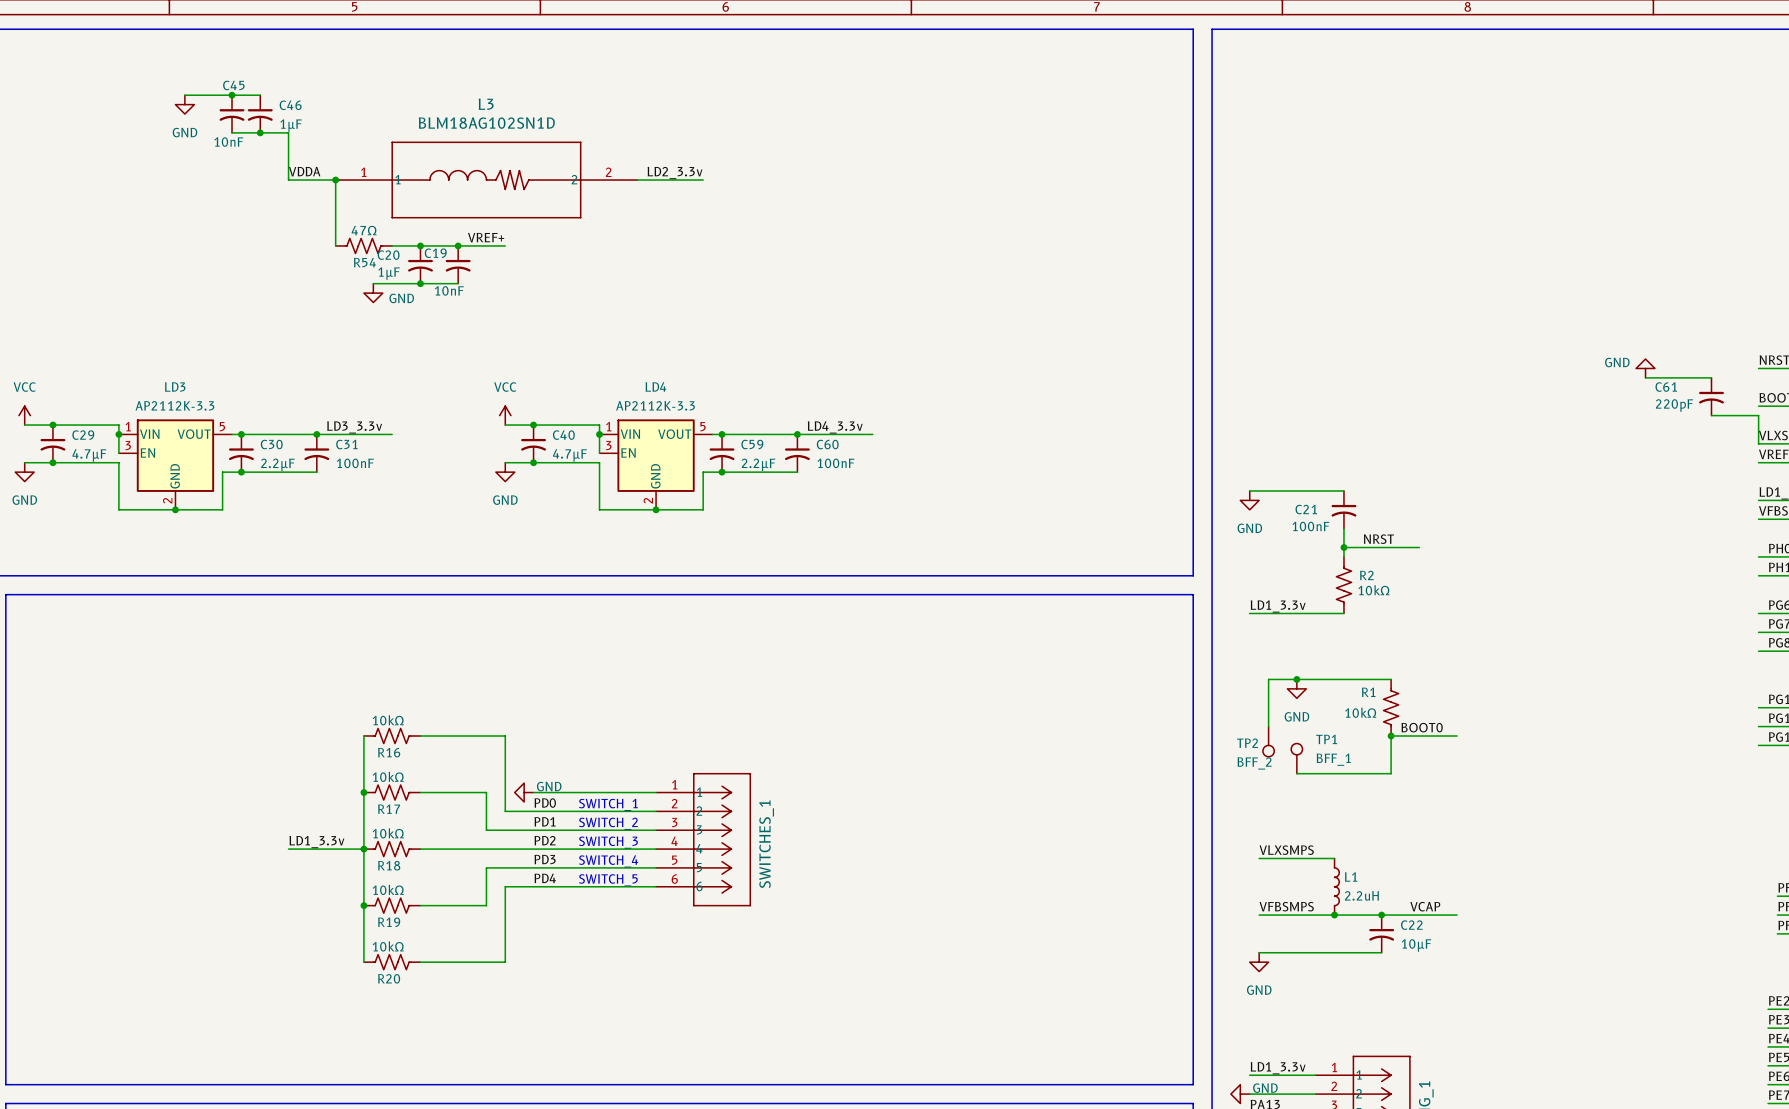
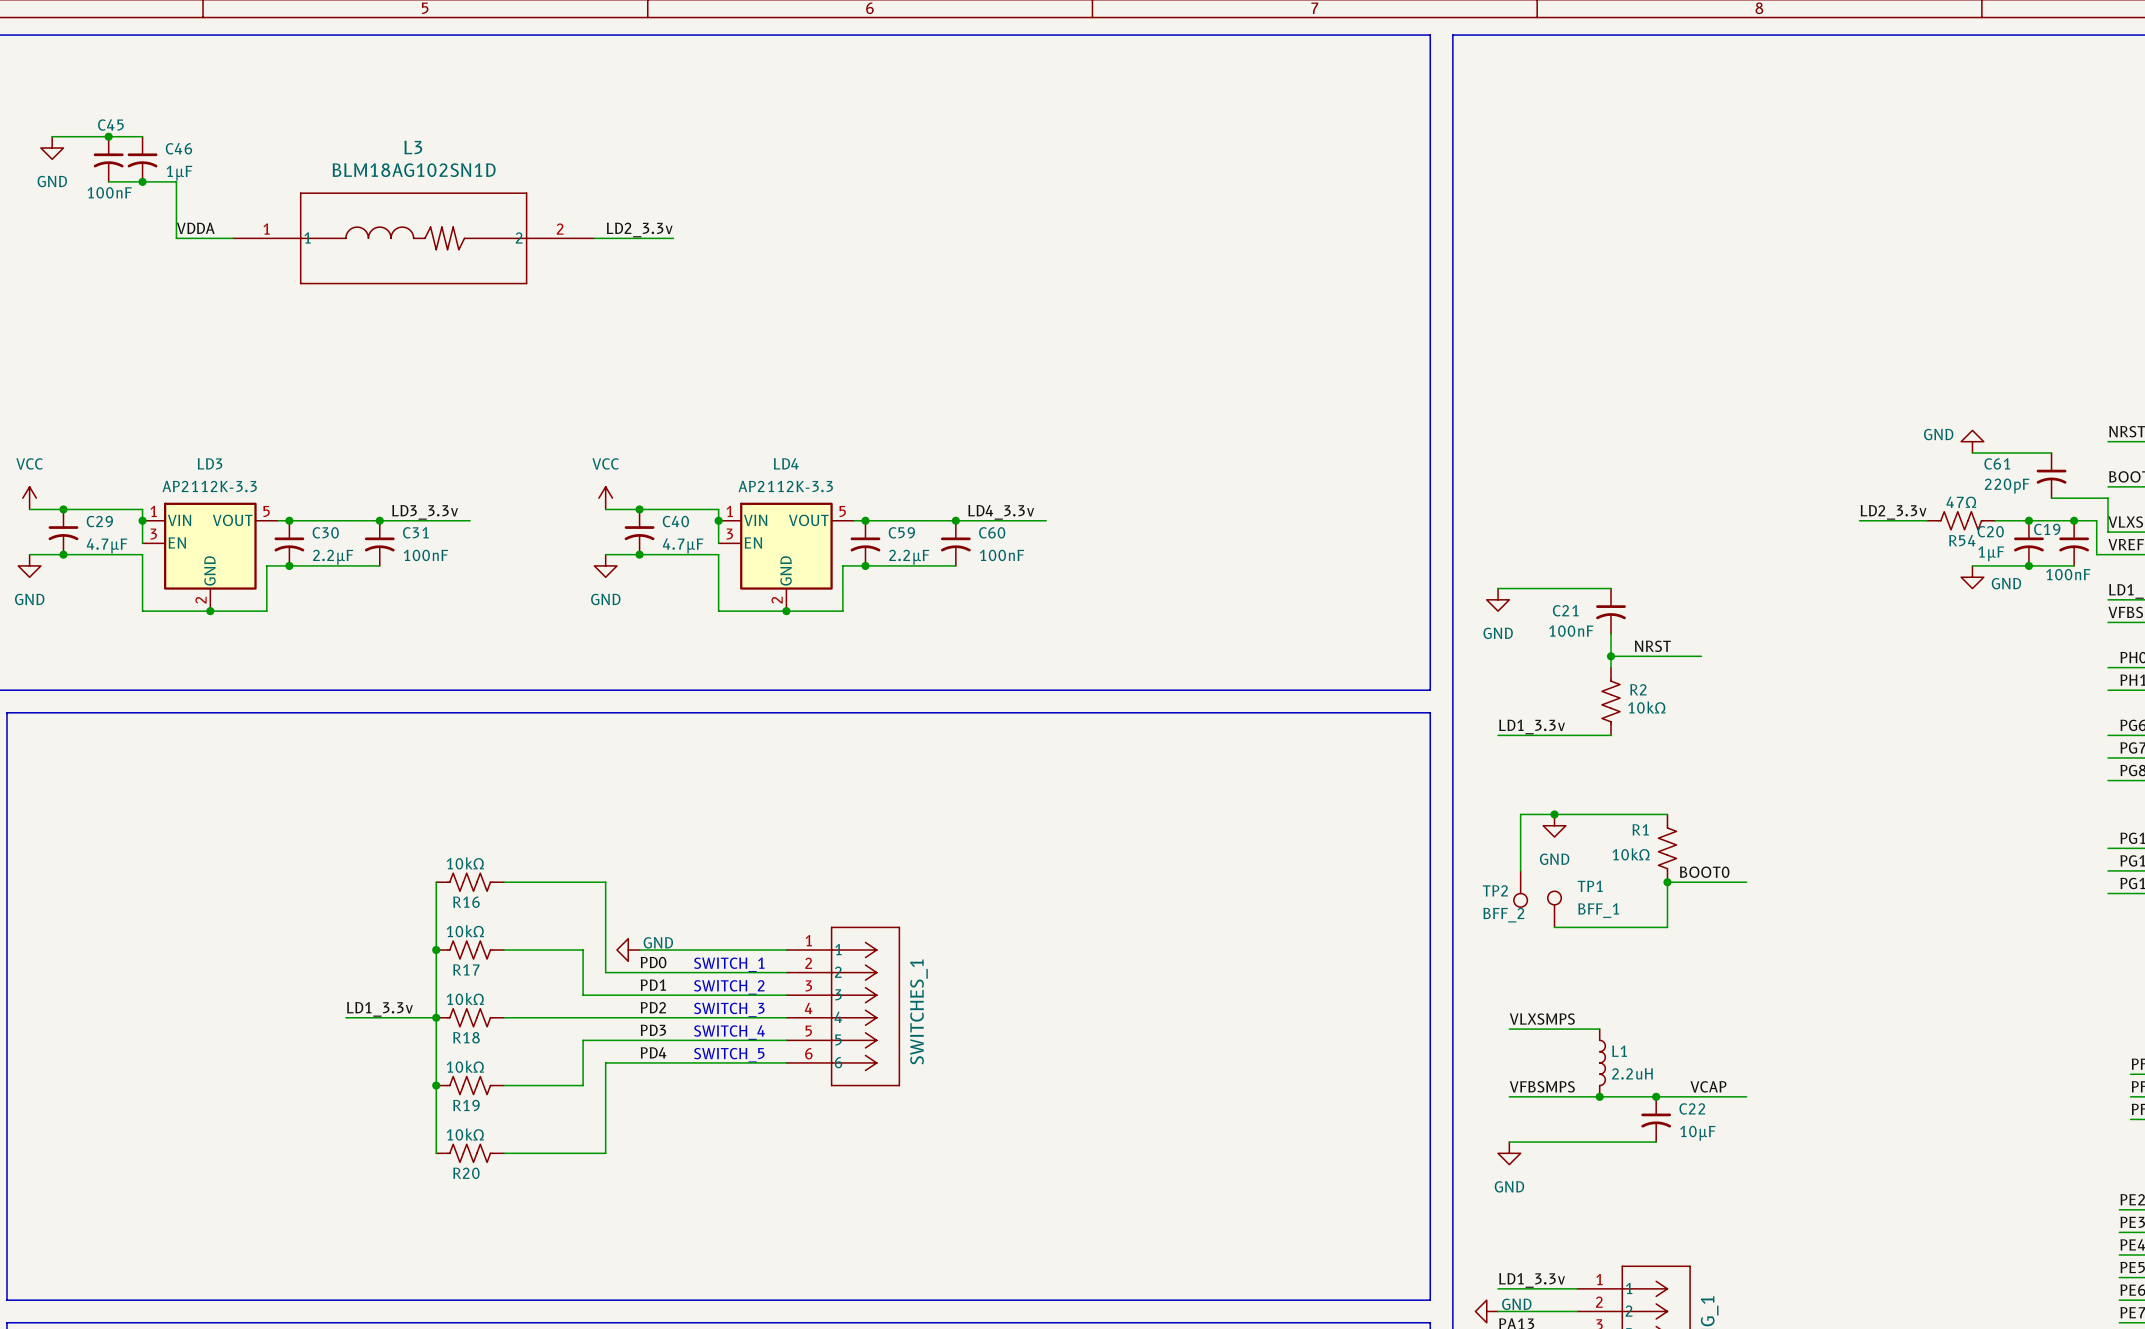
wire: (184, 95) (260, 95) -> (52, 136) (142, 136)
junction: (232, 95) -> none
power symbol position: GND (184, 104) -> GND (52, 148)
junction: none -> (108, 136)
C45 position: (232, 114) -> (108, 159)
C46 position: (260, 114) -> (142, 159)
wire: (232, 132) (288, 132) (288, 180) (335, 180) (335, 245) -> none
junction: (260, 132) -> none
C45 value: 10nF (228, 142) -> 100nF (109, 192)
wire: none -> (108, 181) (176, 181) (176, 238) (232, 238)
junction: none -> (142, 181)
label position: VDDA (304, 171) -> VDDA (195, 228)
label position: LD2_3.3v (675, 173) -> LD2_3.3v (639, 229)
junction: (335, 180) -> none
L3 position: (486, 180) -> (413, 238)
wire: (637, 180) (703, 180) -> (594, 238) (673, 238)
label: VREF+ (486, 237) -> none
R54 position: (363, 245) -> (1961, 520)
wire: (392, 245) (505, 245) -> none
junction: (420, 245) -> none
junction: (458, 245) -> none
C20 position: (420, 264) -> (2028, 543)
C19 position: (458, 264) -> (2074, 543)
wire: (373, 283) (458, 283) -> none
junction: (420, 283) -> none
C19 value: 10nF (449, 290) -> 100nF (2068, 574)
power symbol: GND (373, 293) -> none
label: none -> LD2_3.3v (1893, 512)
wire: none -> (1859, 520) (1927, 520)
wire: none -> (1995, 520) (2096, 520) (2096, 554) (2108, 554)
junction: none -> (2028, 520)
junction: none -> (2074, 520)
wire: none -> (1972, 565) (2074, 565)
junction: none -> (2028, 565)
power symbol: none -> GND (1972, 577)

